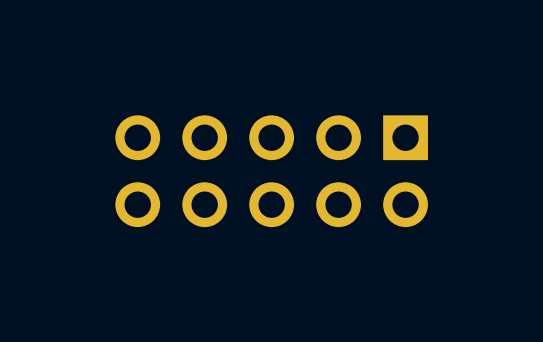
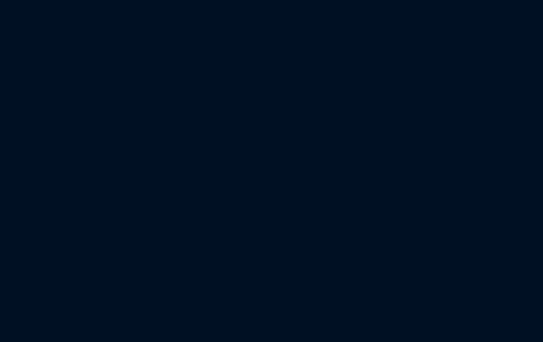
part: (271, 171) -> none

